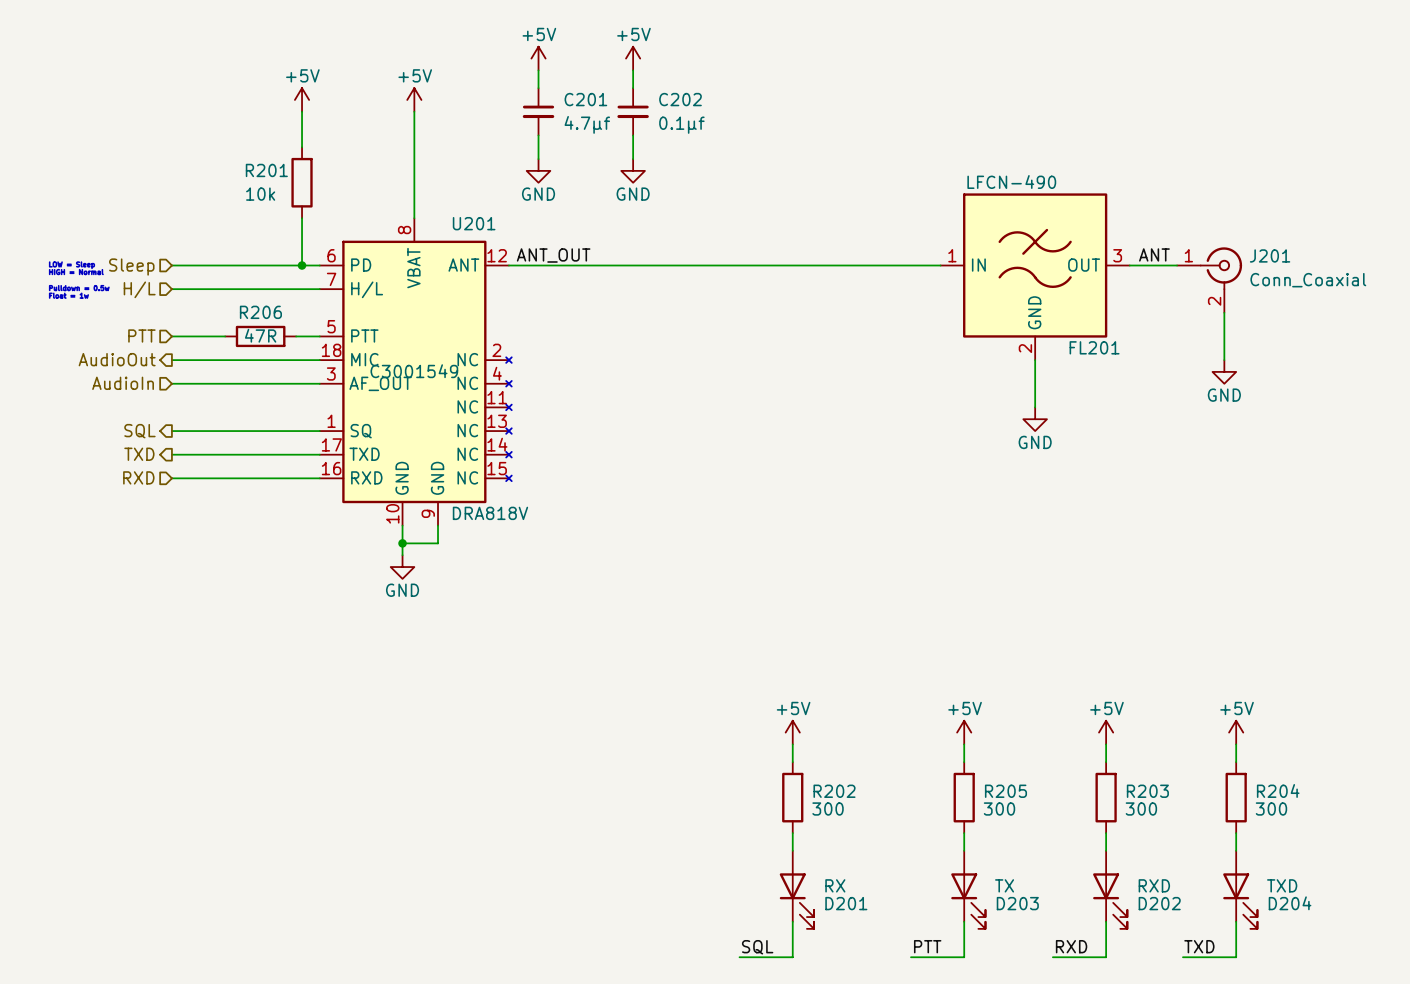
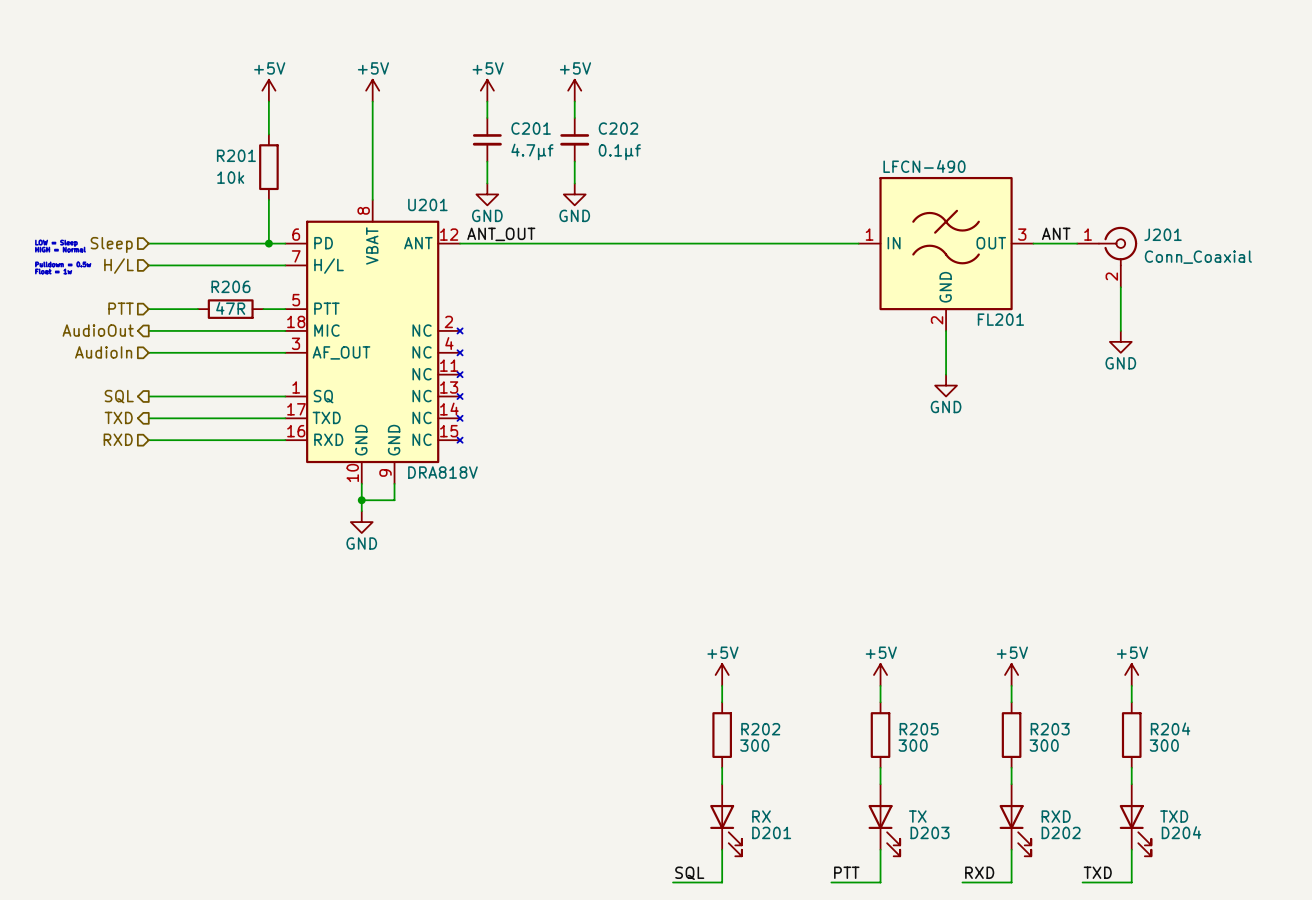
power symbol position: +5V (538, 58) -> +5V (487, 90)
power symbol position: +5V (633, 58) -> +5V (574, 90)
C201 position: (538, 111) -> (487, 139)
C202 position: (633, 111) -> (574, 139)
power symbol position: GND (538, 170) -> GND (487, 194)
power symbol position: GND (633, 170) -> GND (574, 194)
U201 text: C3001549 (414, 371) -> none

